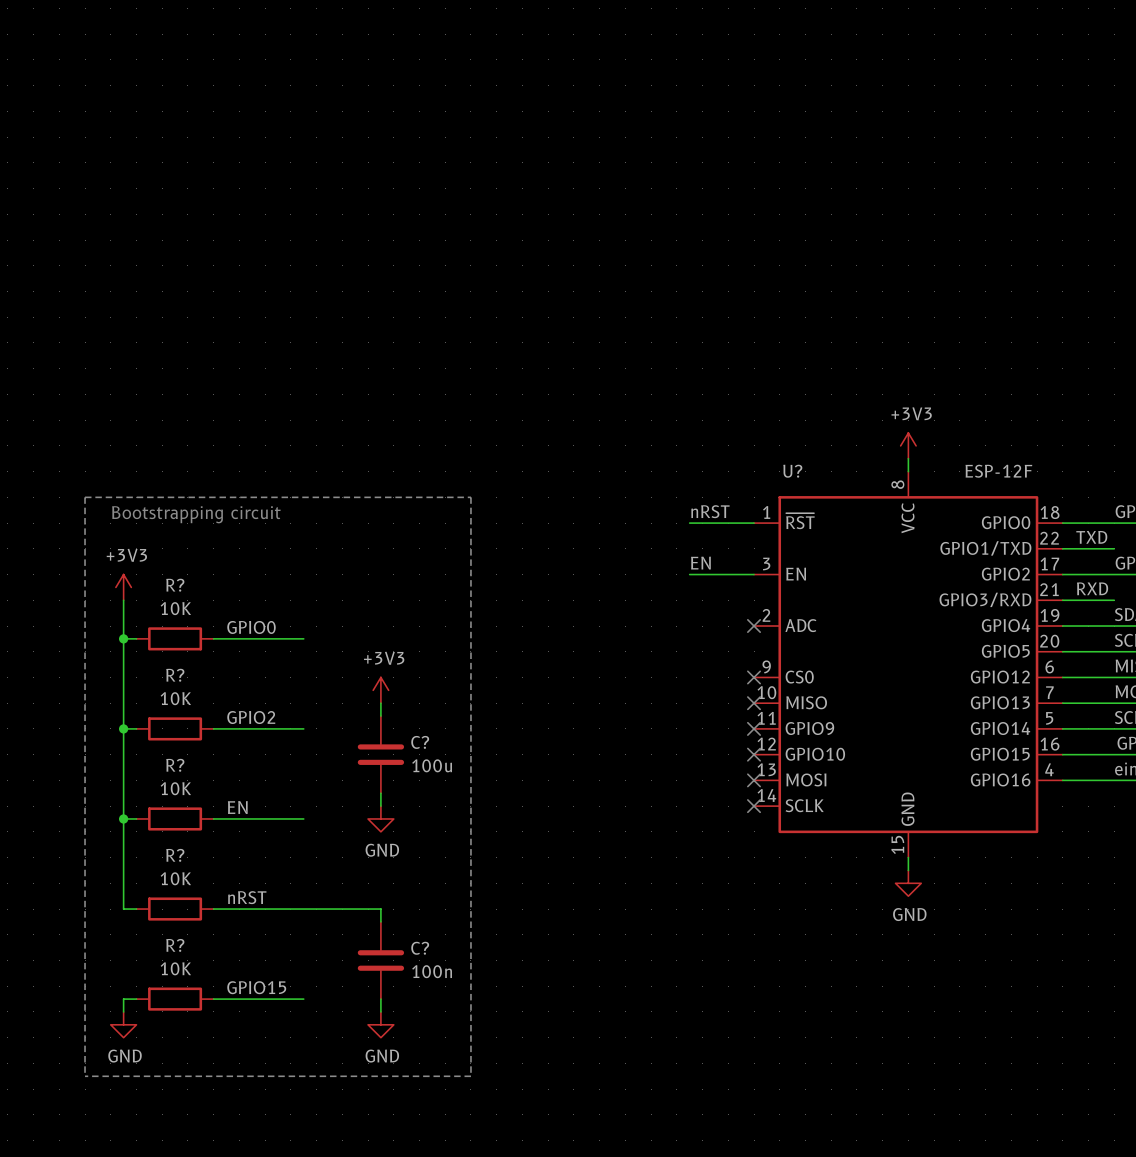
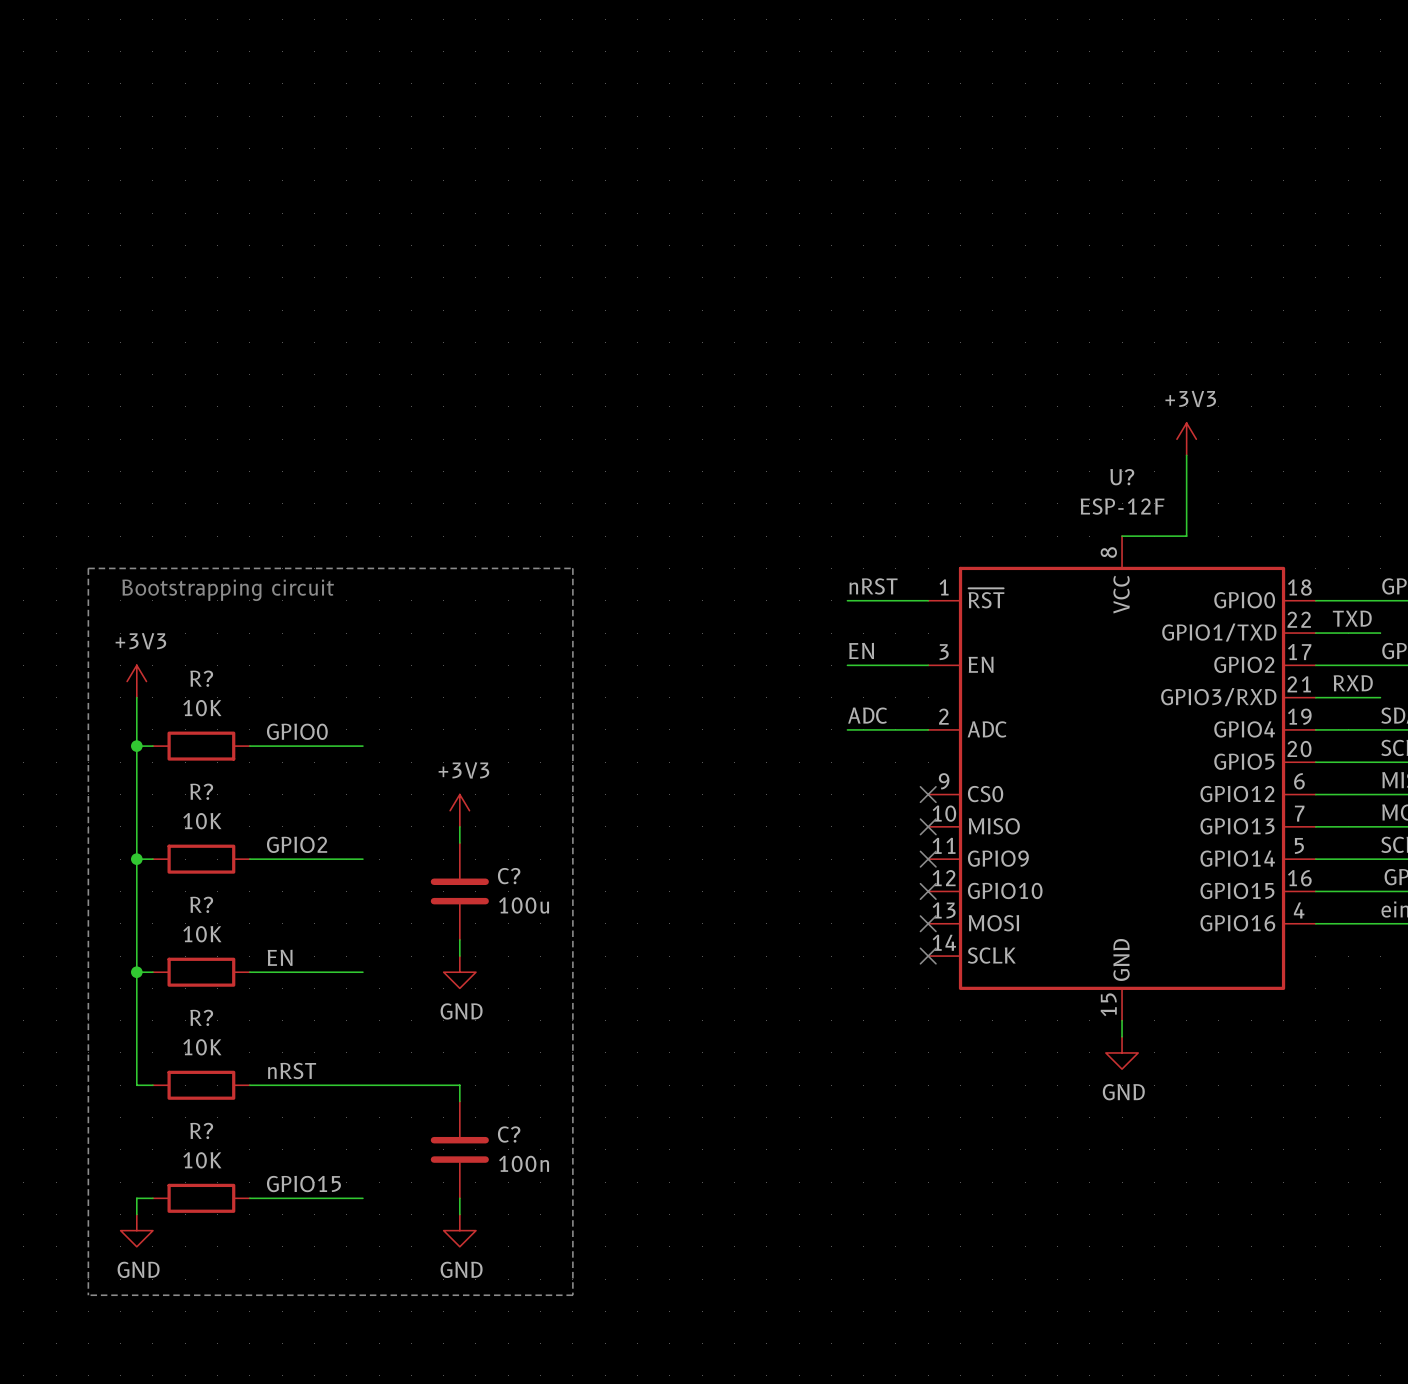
power symbol position: +3V3 (908, 445) -> +3V3 (1186, 439)
wire: (908, 458) (908, 471) -> (1186, 455) (1186, 536) (1122, 536)
U? name position: U? (792, 471) -> U? (1122, 477)
U? value position: ESP-12F (998, 471) -> ESP-12F (1122, 506)
label: none -> ADC (867, 715)
wire: none -> (847, 729) (928, 729)
no-connect mark: (754, 626) -> none

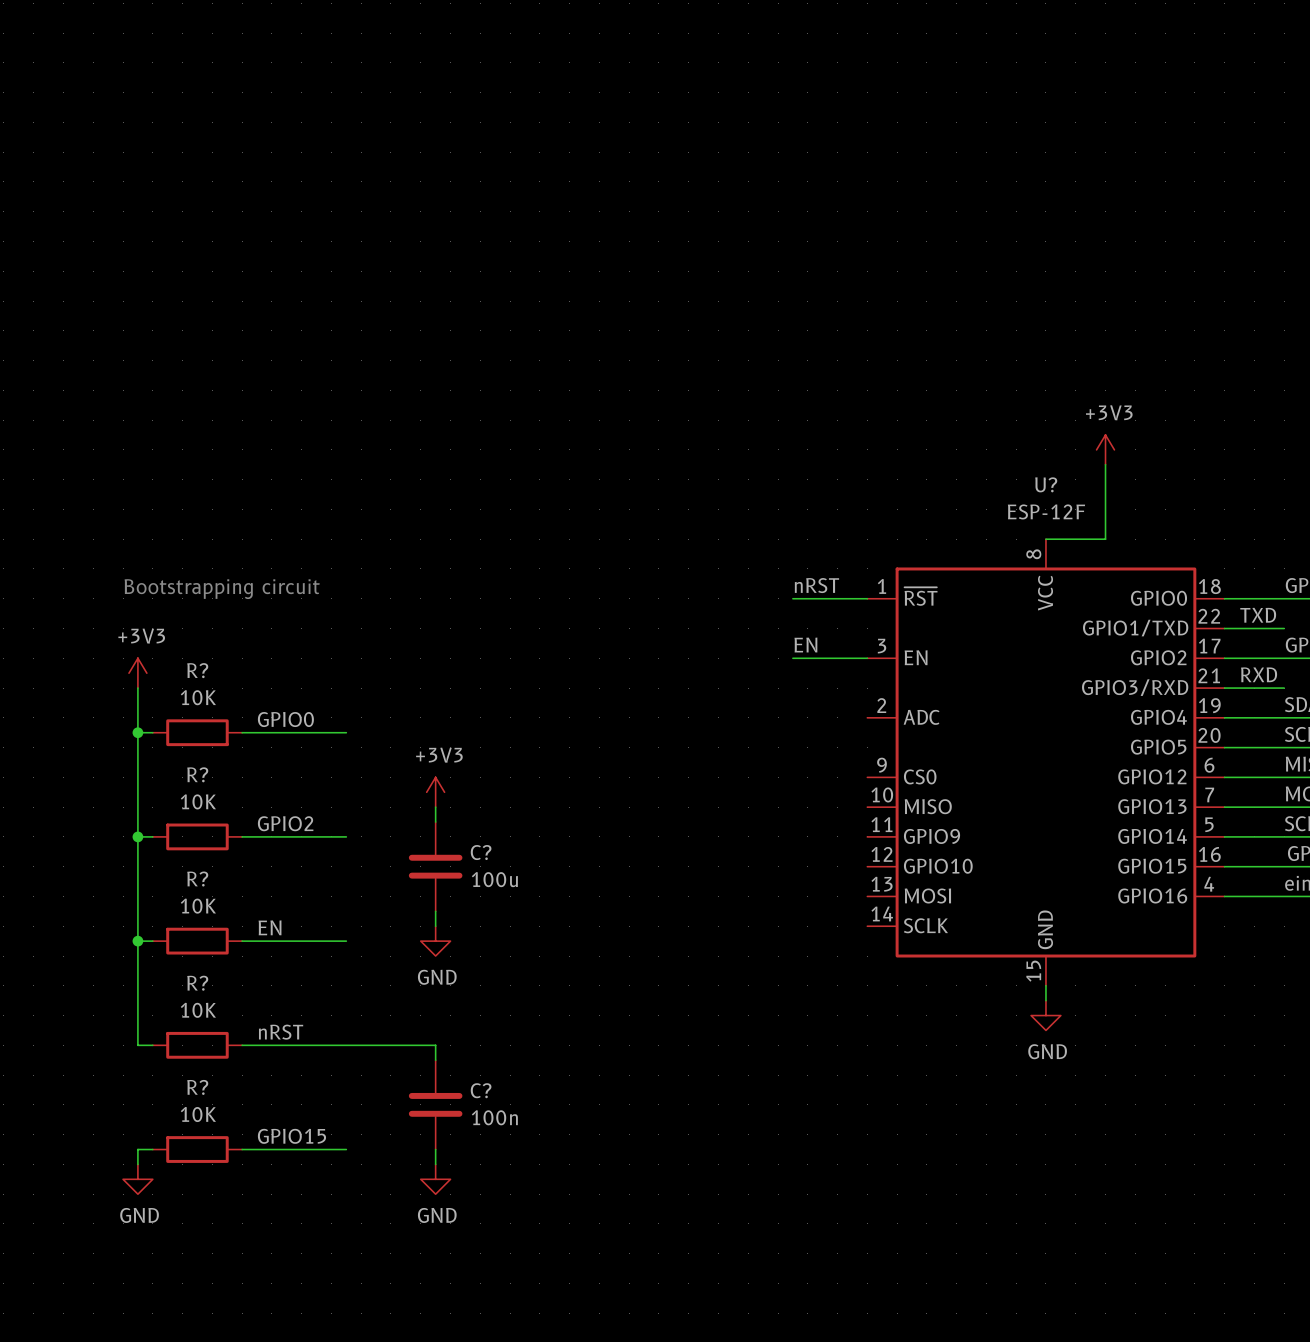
line: (88, 568) (572, 568) (572, 1295) (88, 1295) (88, 568) -> none
label: ADC (867, 715) -> none
wire: (847, 729) (928, 729) -> none
no-connect mark: (928, 794) -> none
no-connect mark: (928, 826) -> none
no-connect mark: (928, 859) -> none
no-connect mark: (928, 891) -> none
no-connect mark: (928, 923) -> none
no-connect mark: (928, 956) -> none

